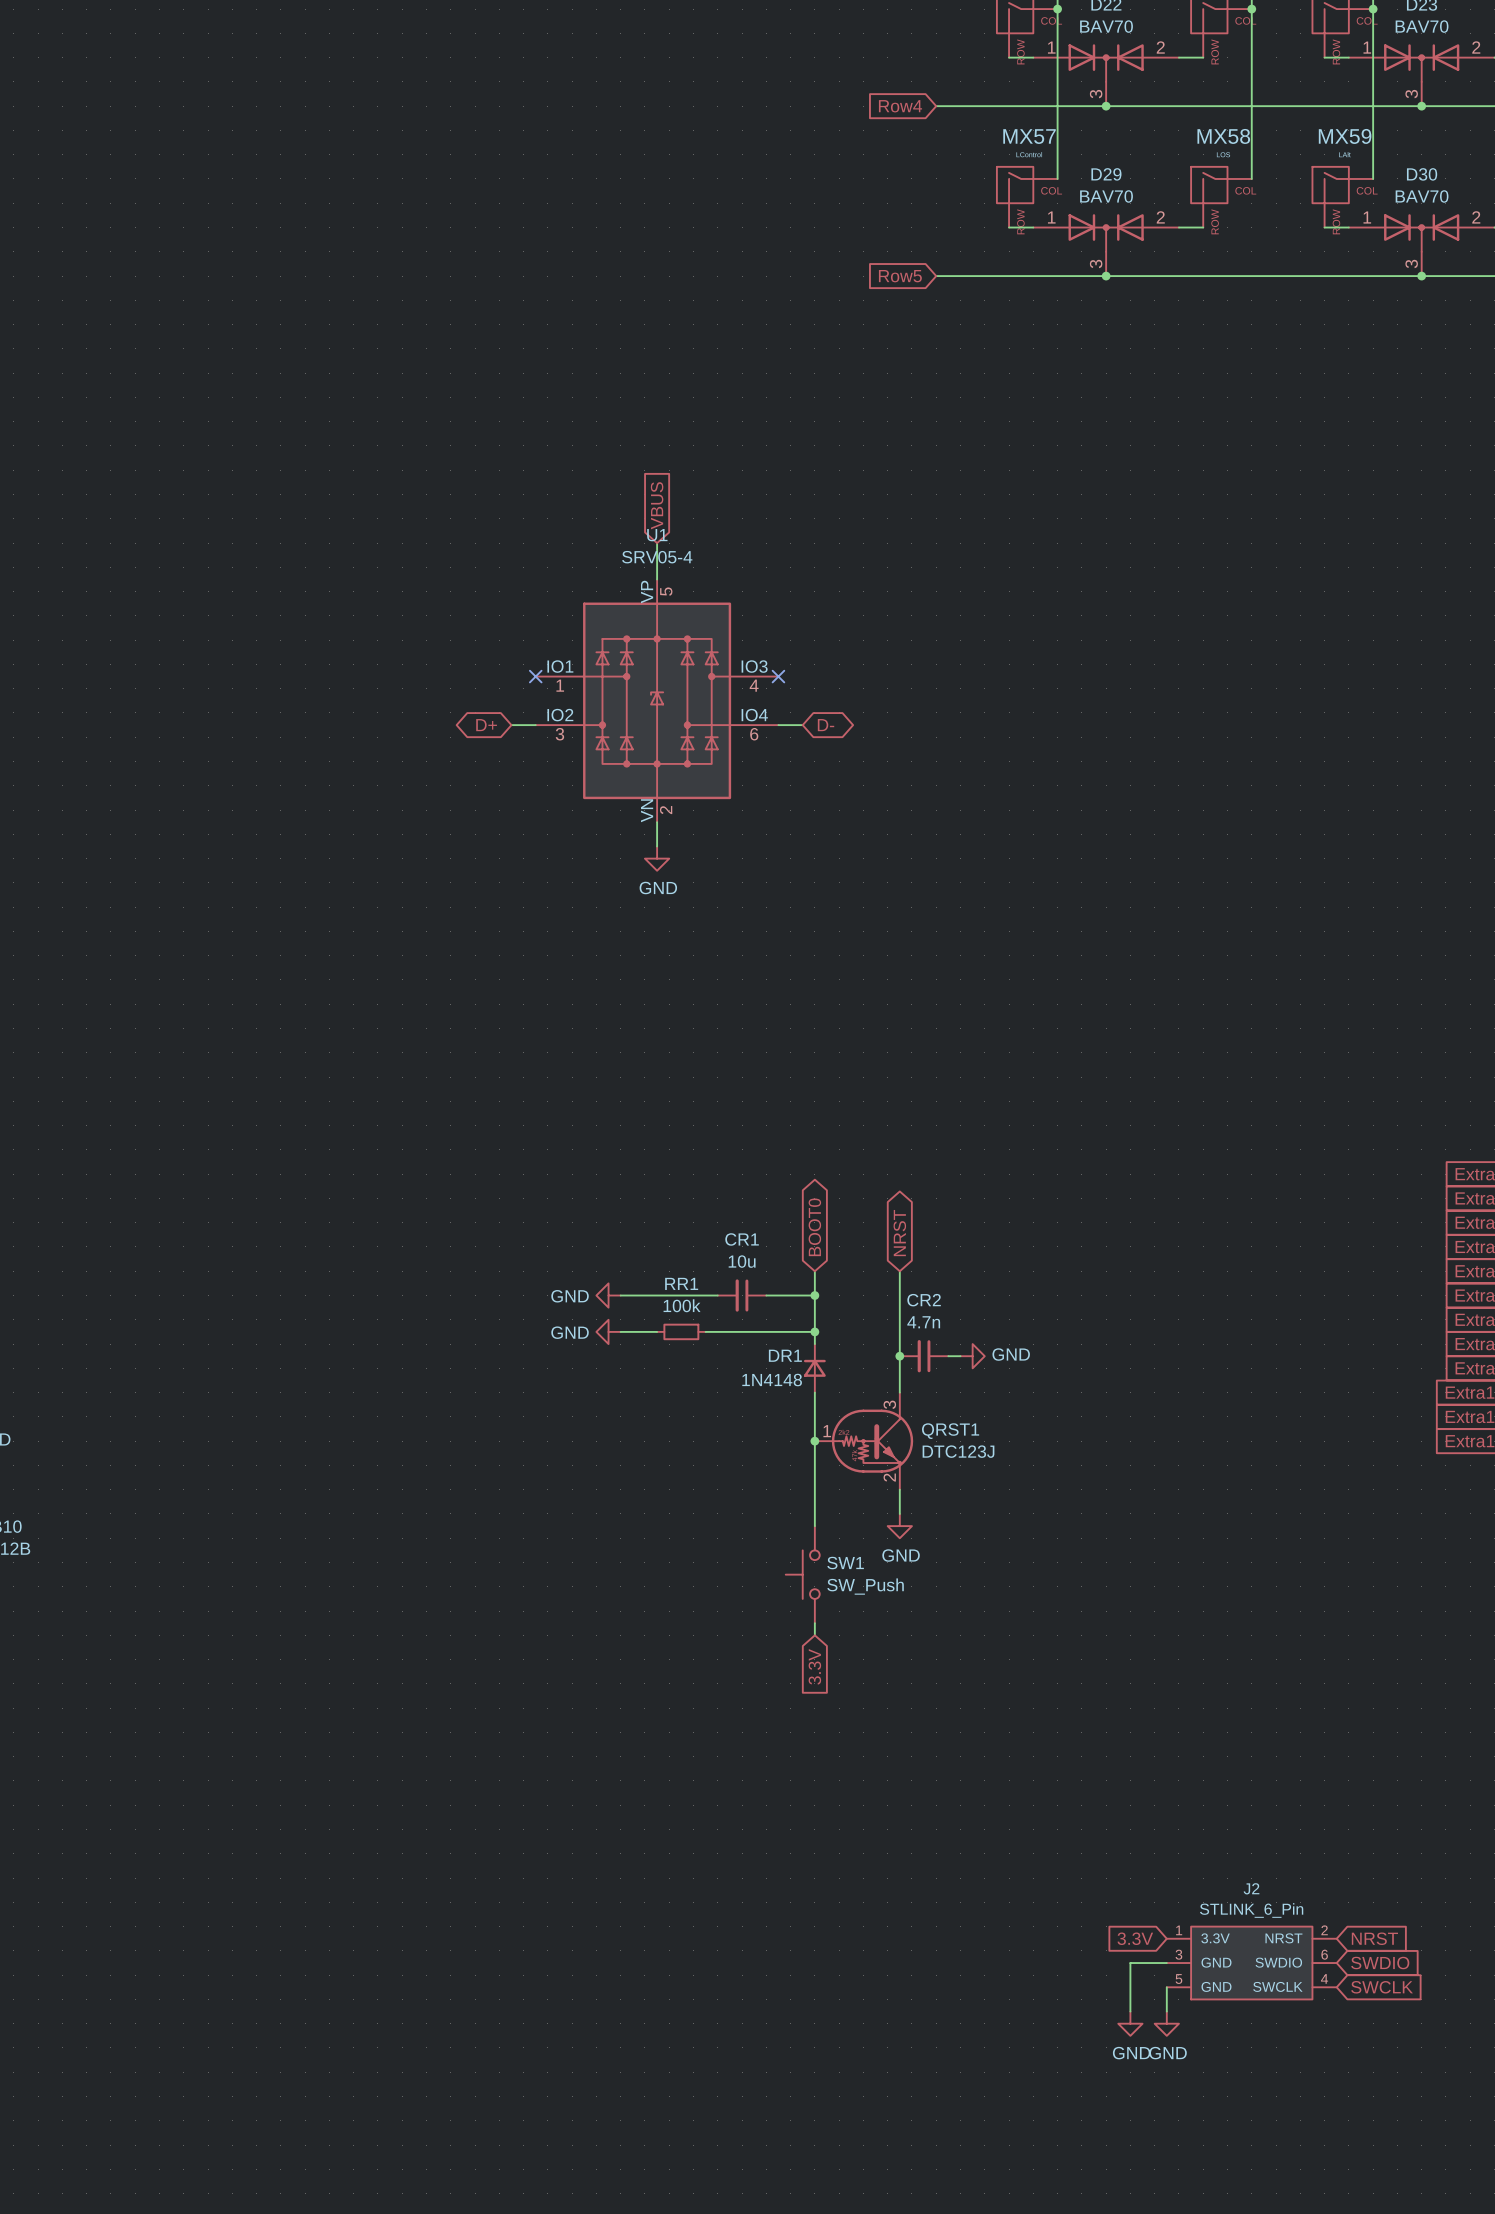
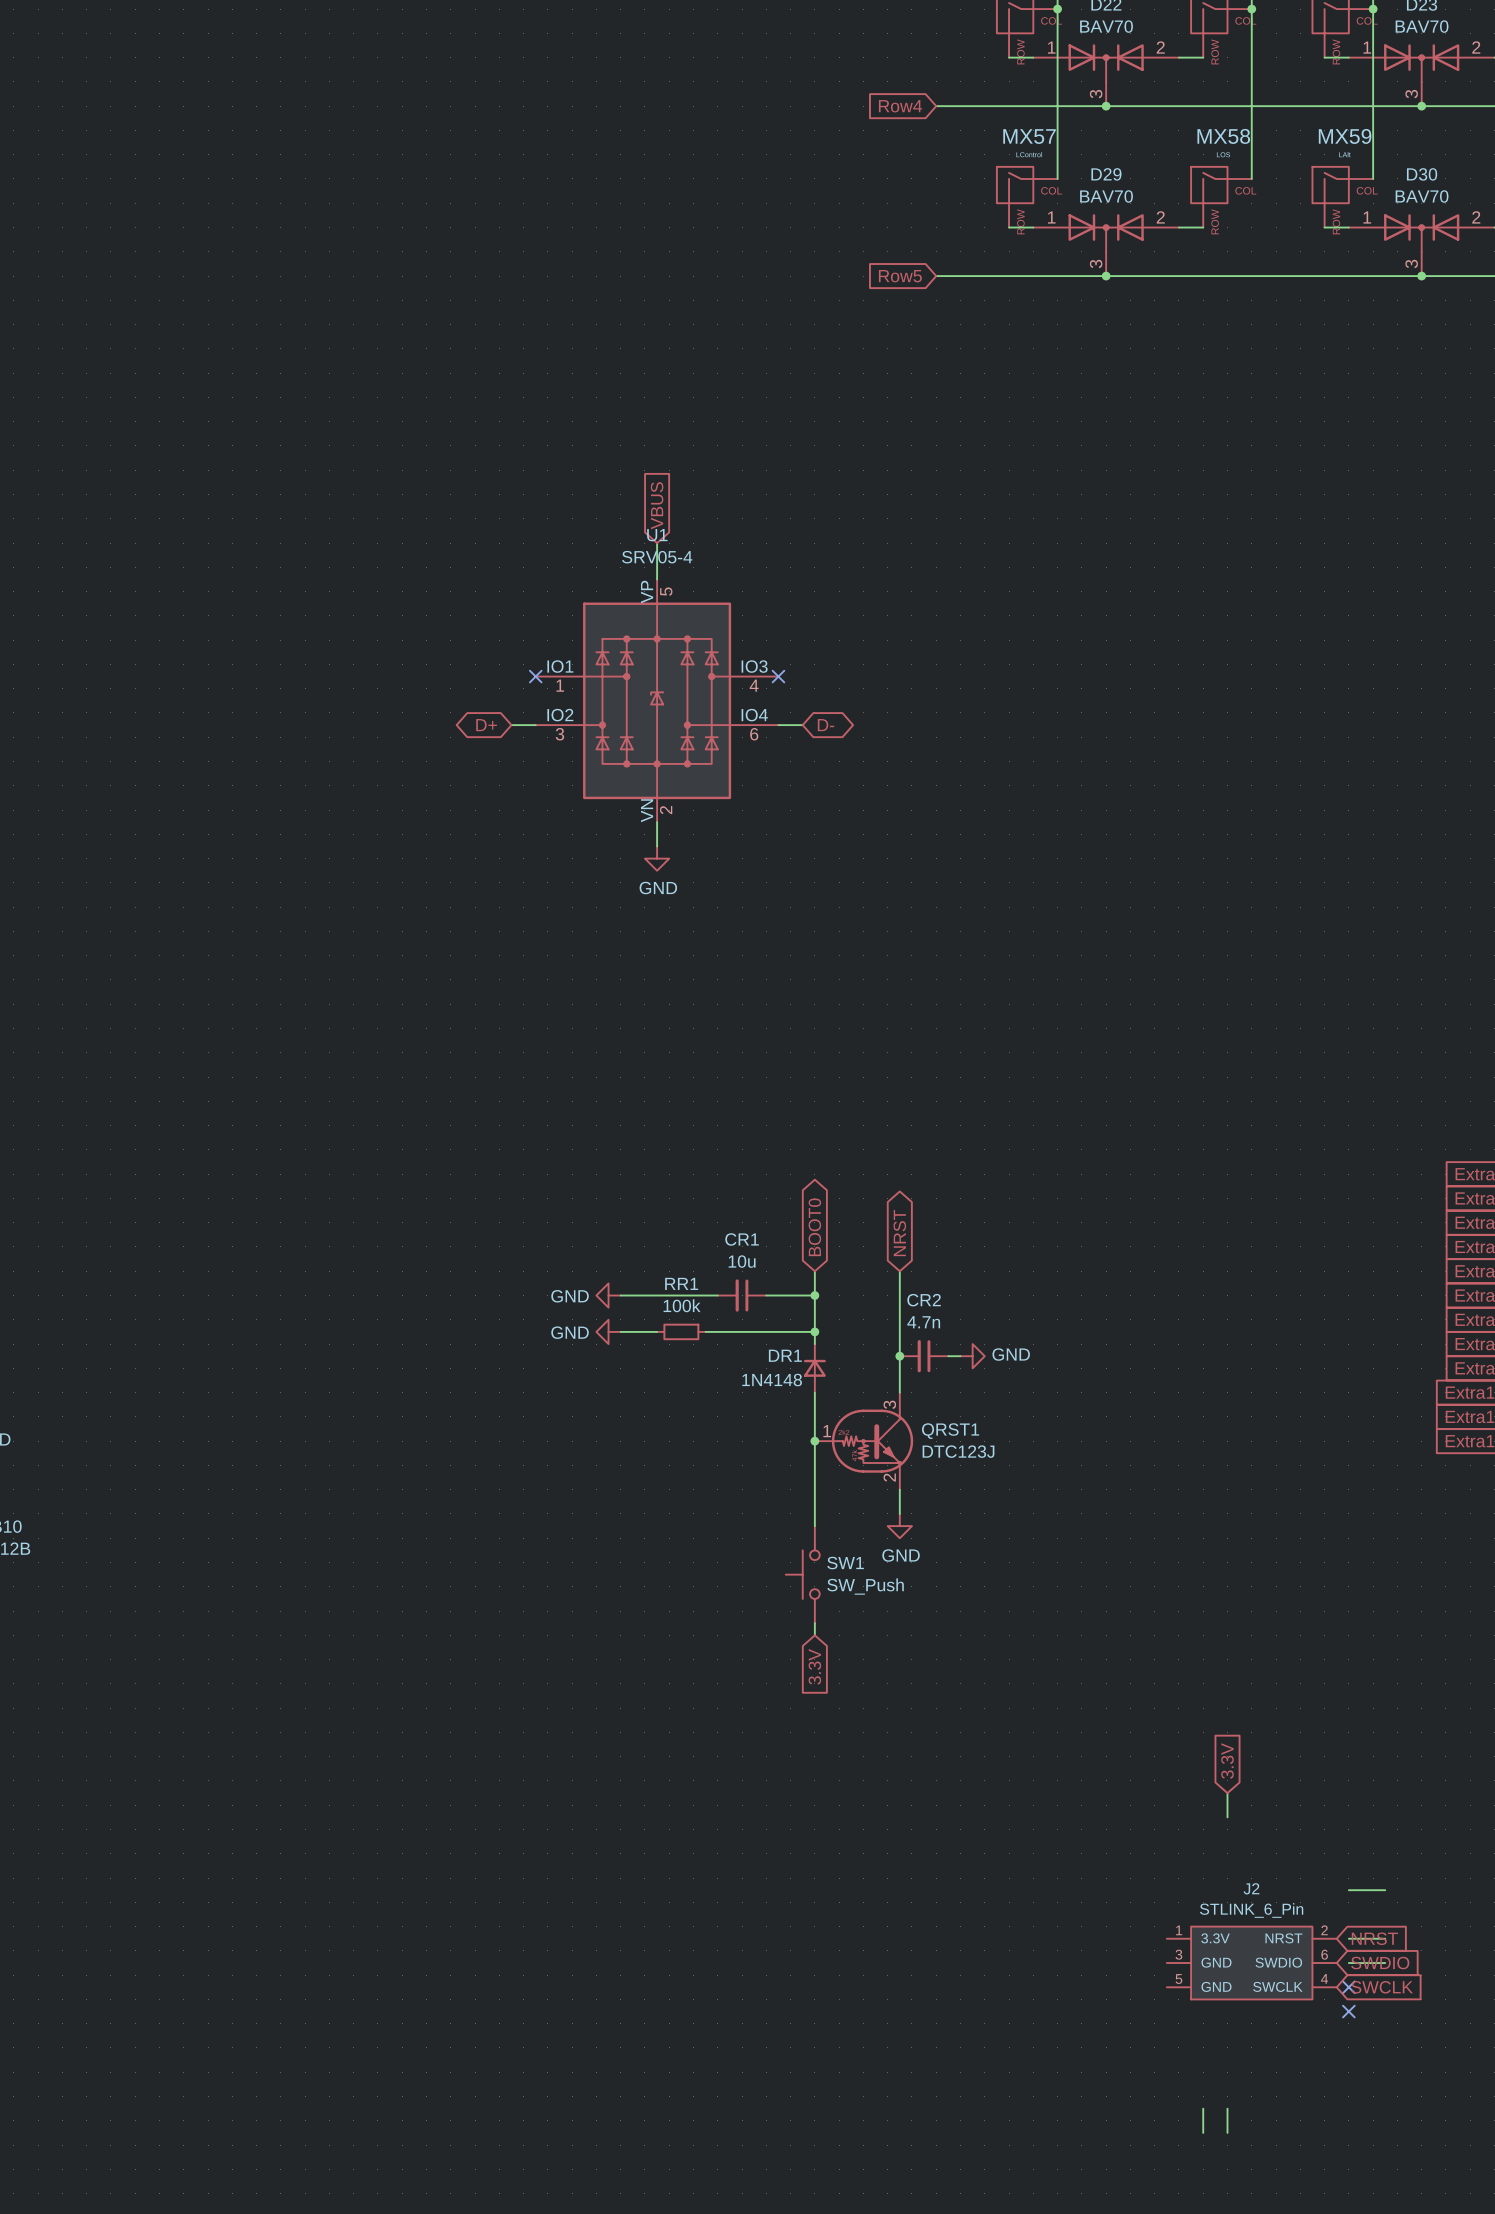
wire: none -> (1227, 1793) (1227, 1817)
wire: none -> (1348, 1890) (1385, 1890)
global label rotation: 0° (1135, 1938) -> 90° clockwise (1227, 1761)
global label position: 3.3V (1135, 1938) -> 3.3V (1227, 1761)
wire: none -> (1348, 1938) (1385, 1938)
wire: (1166, 1963) (1130, 1963) (1130, 2011) -> none
wire: none -> (1348, 1963) (1385, 1963)
wire: (1166, 1987) (1166, 2011) -> (1203, 2108) (1203, 2132)
no-connect mark: none -> (1348, 1987)
no-connect mark: none -> (1348, 2011)
power symbol: GND (1130, 2023) -> none
power symbol: GND (1166, 2023) -> none
wire: none -> (1227, 2108) (1227, 2132)

